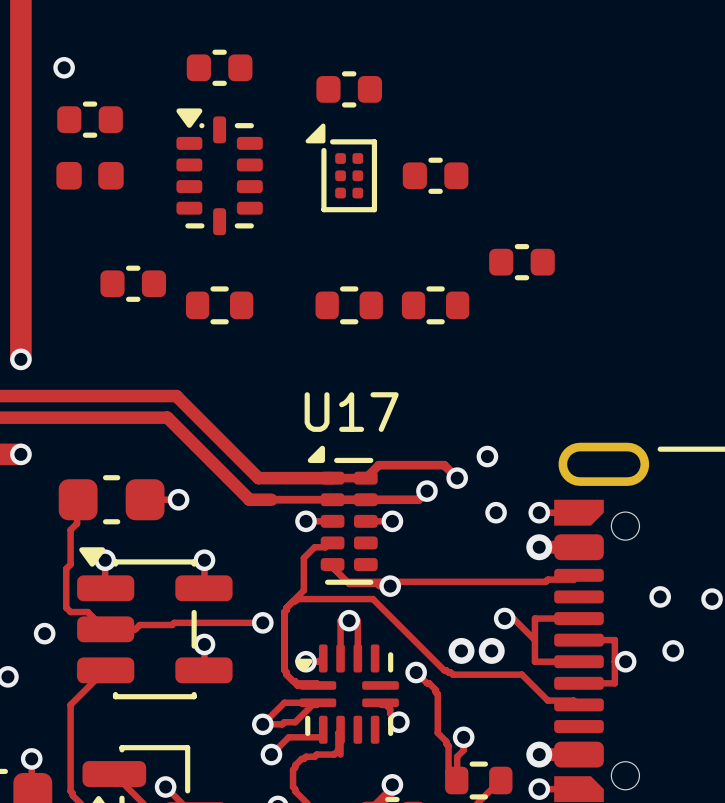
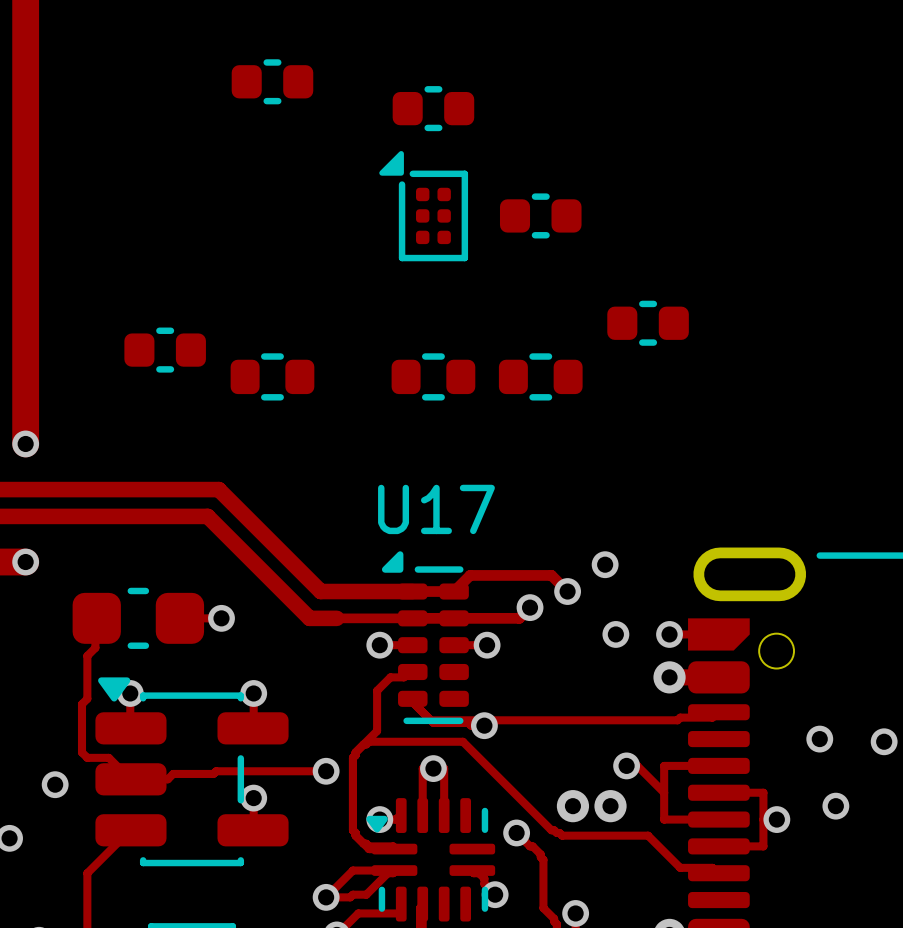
via: (64, 67) -> none
part: (90, 119) -> none
part: (219, 171) -> none
part: (90, 175) -> none

